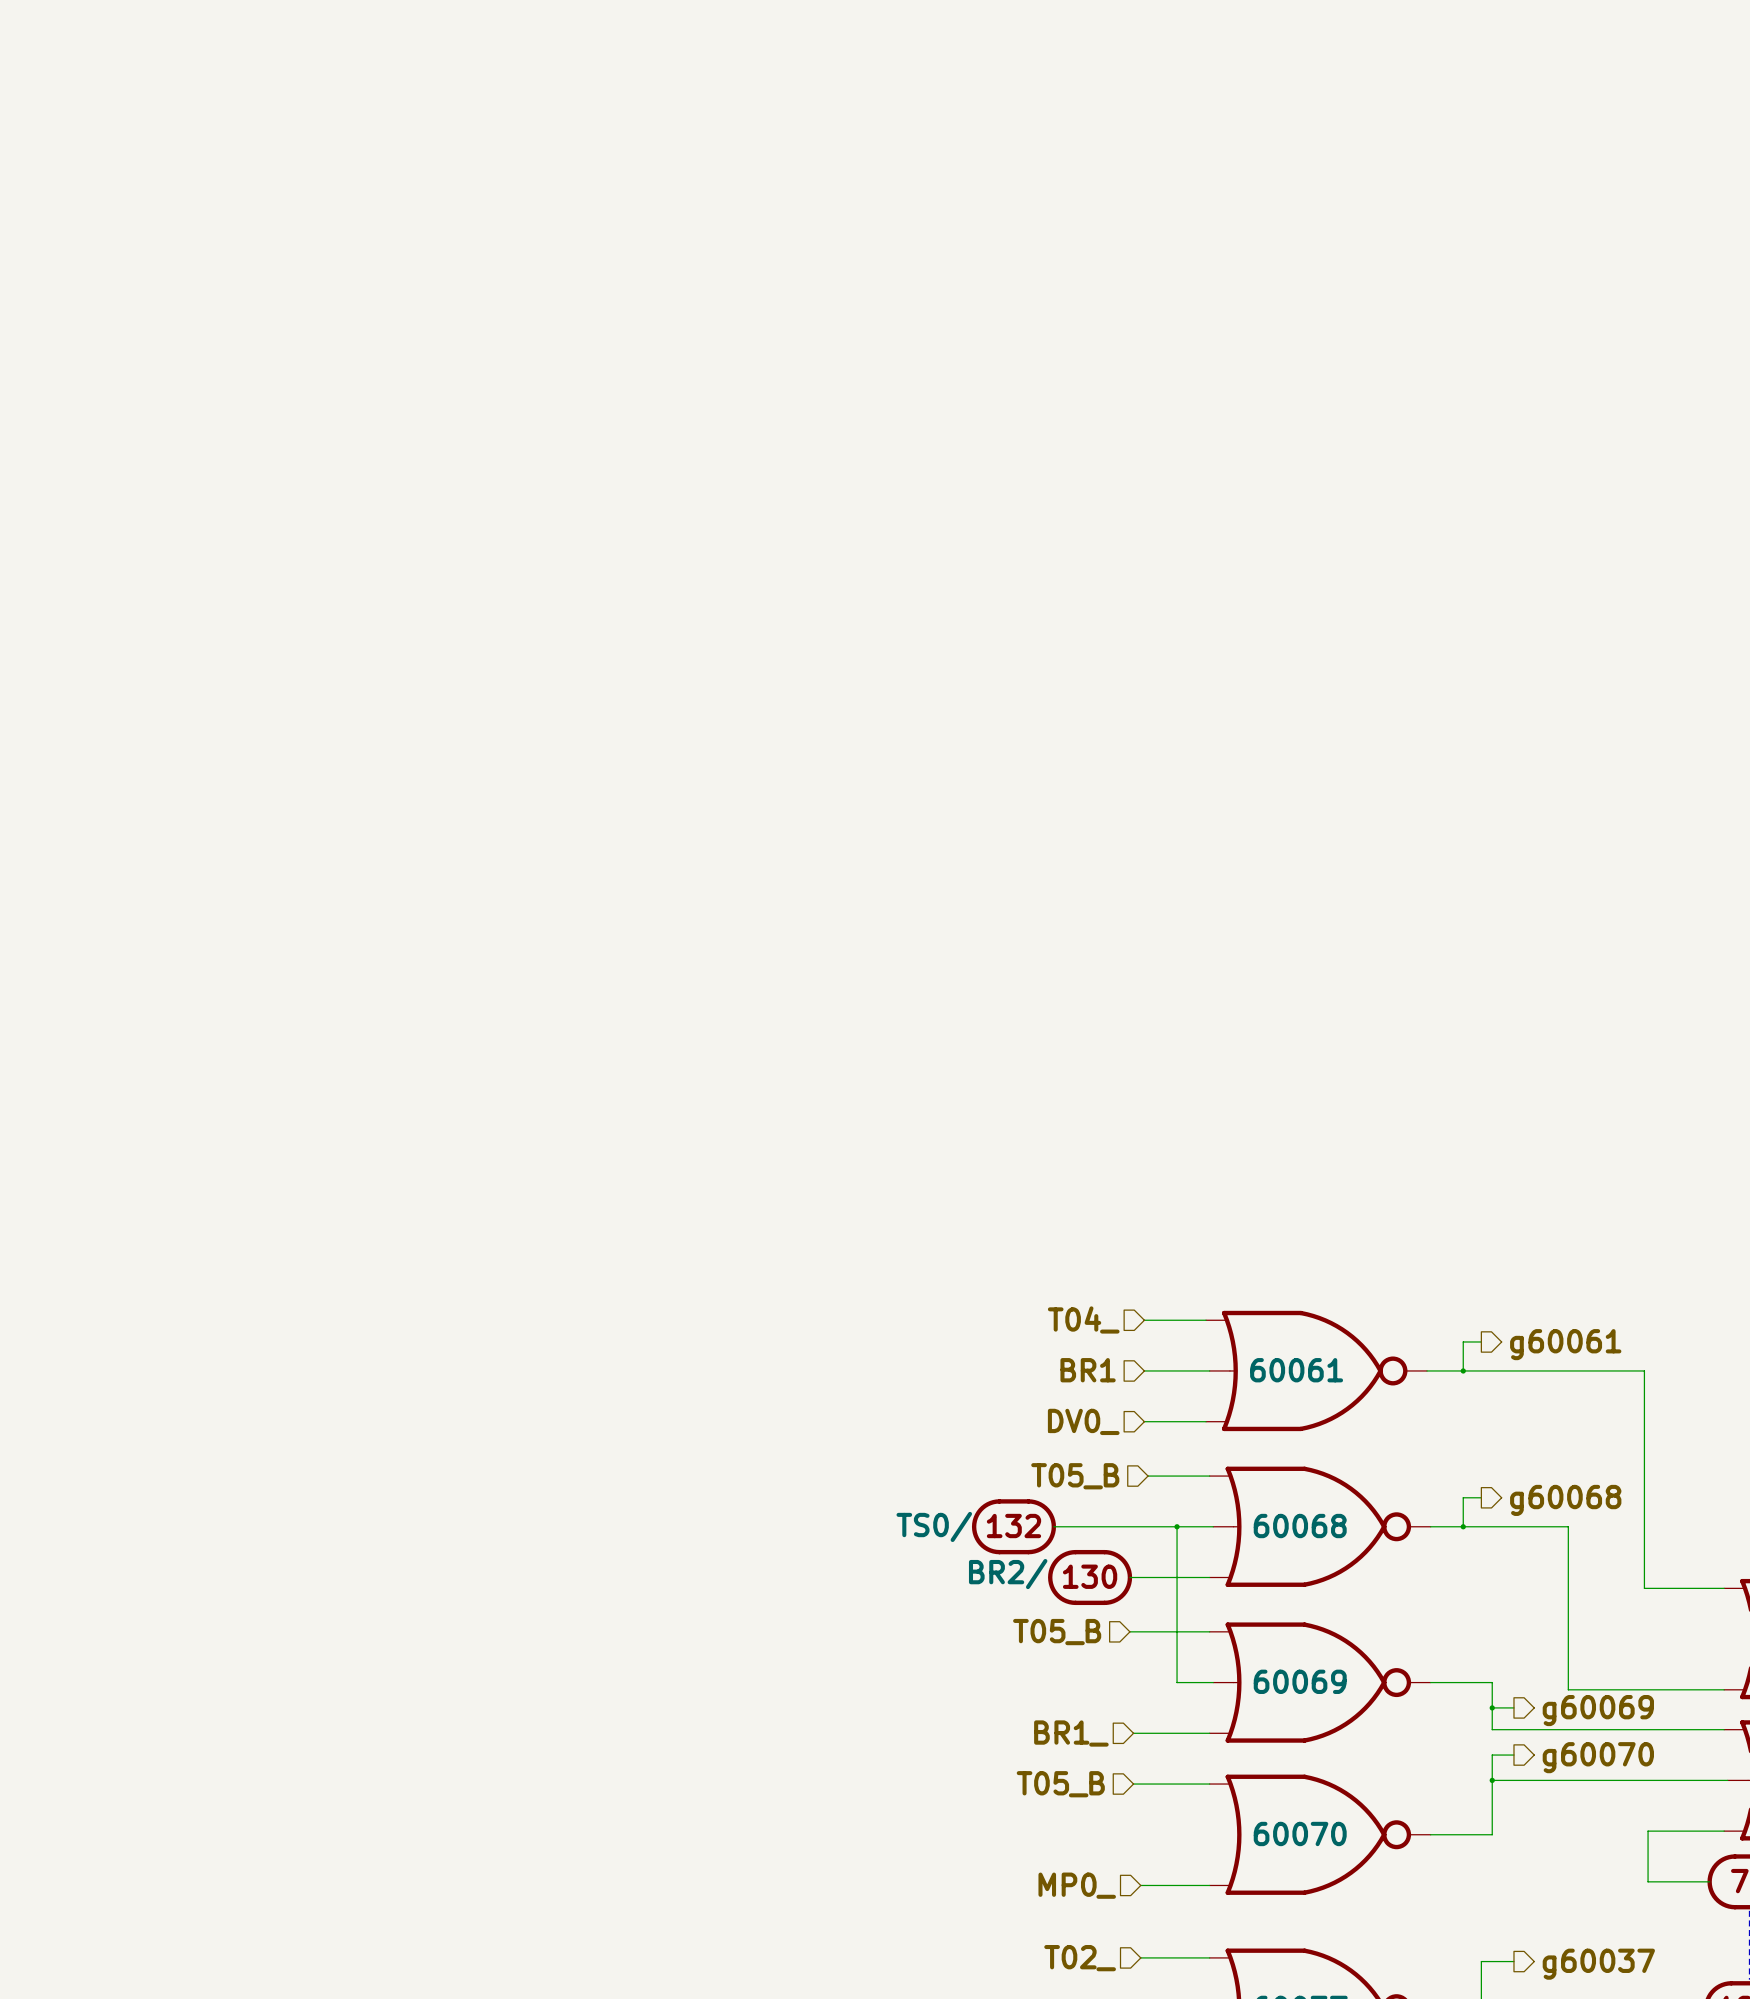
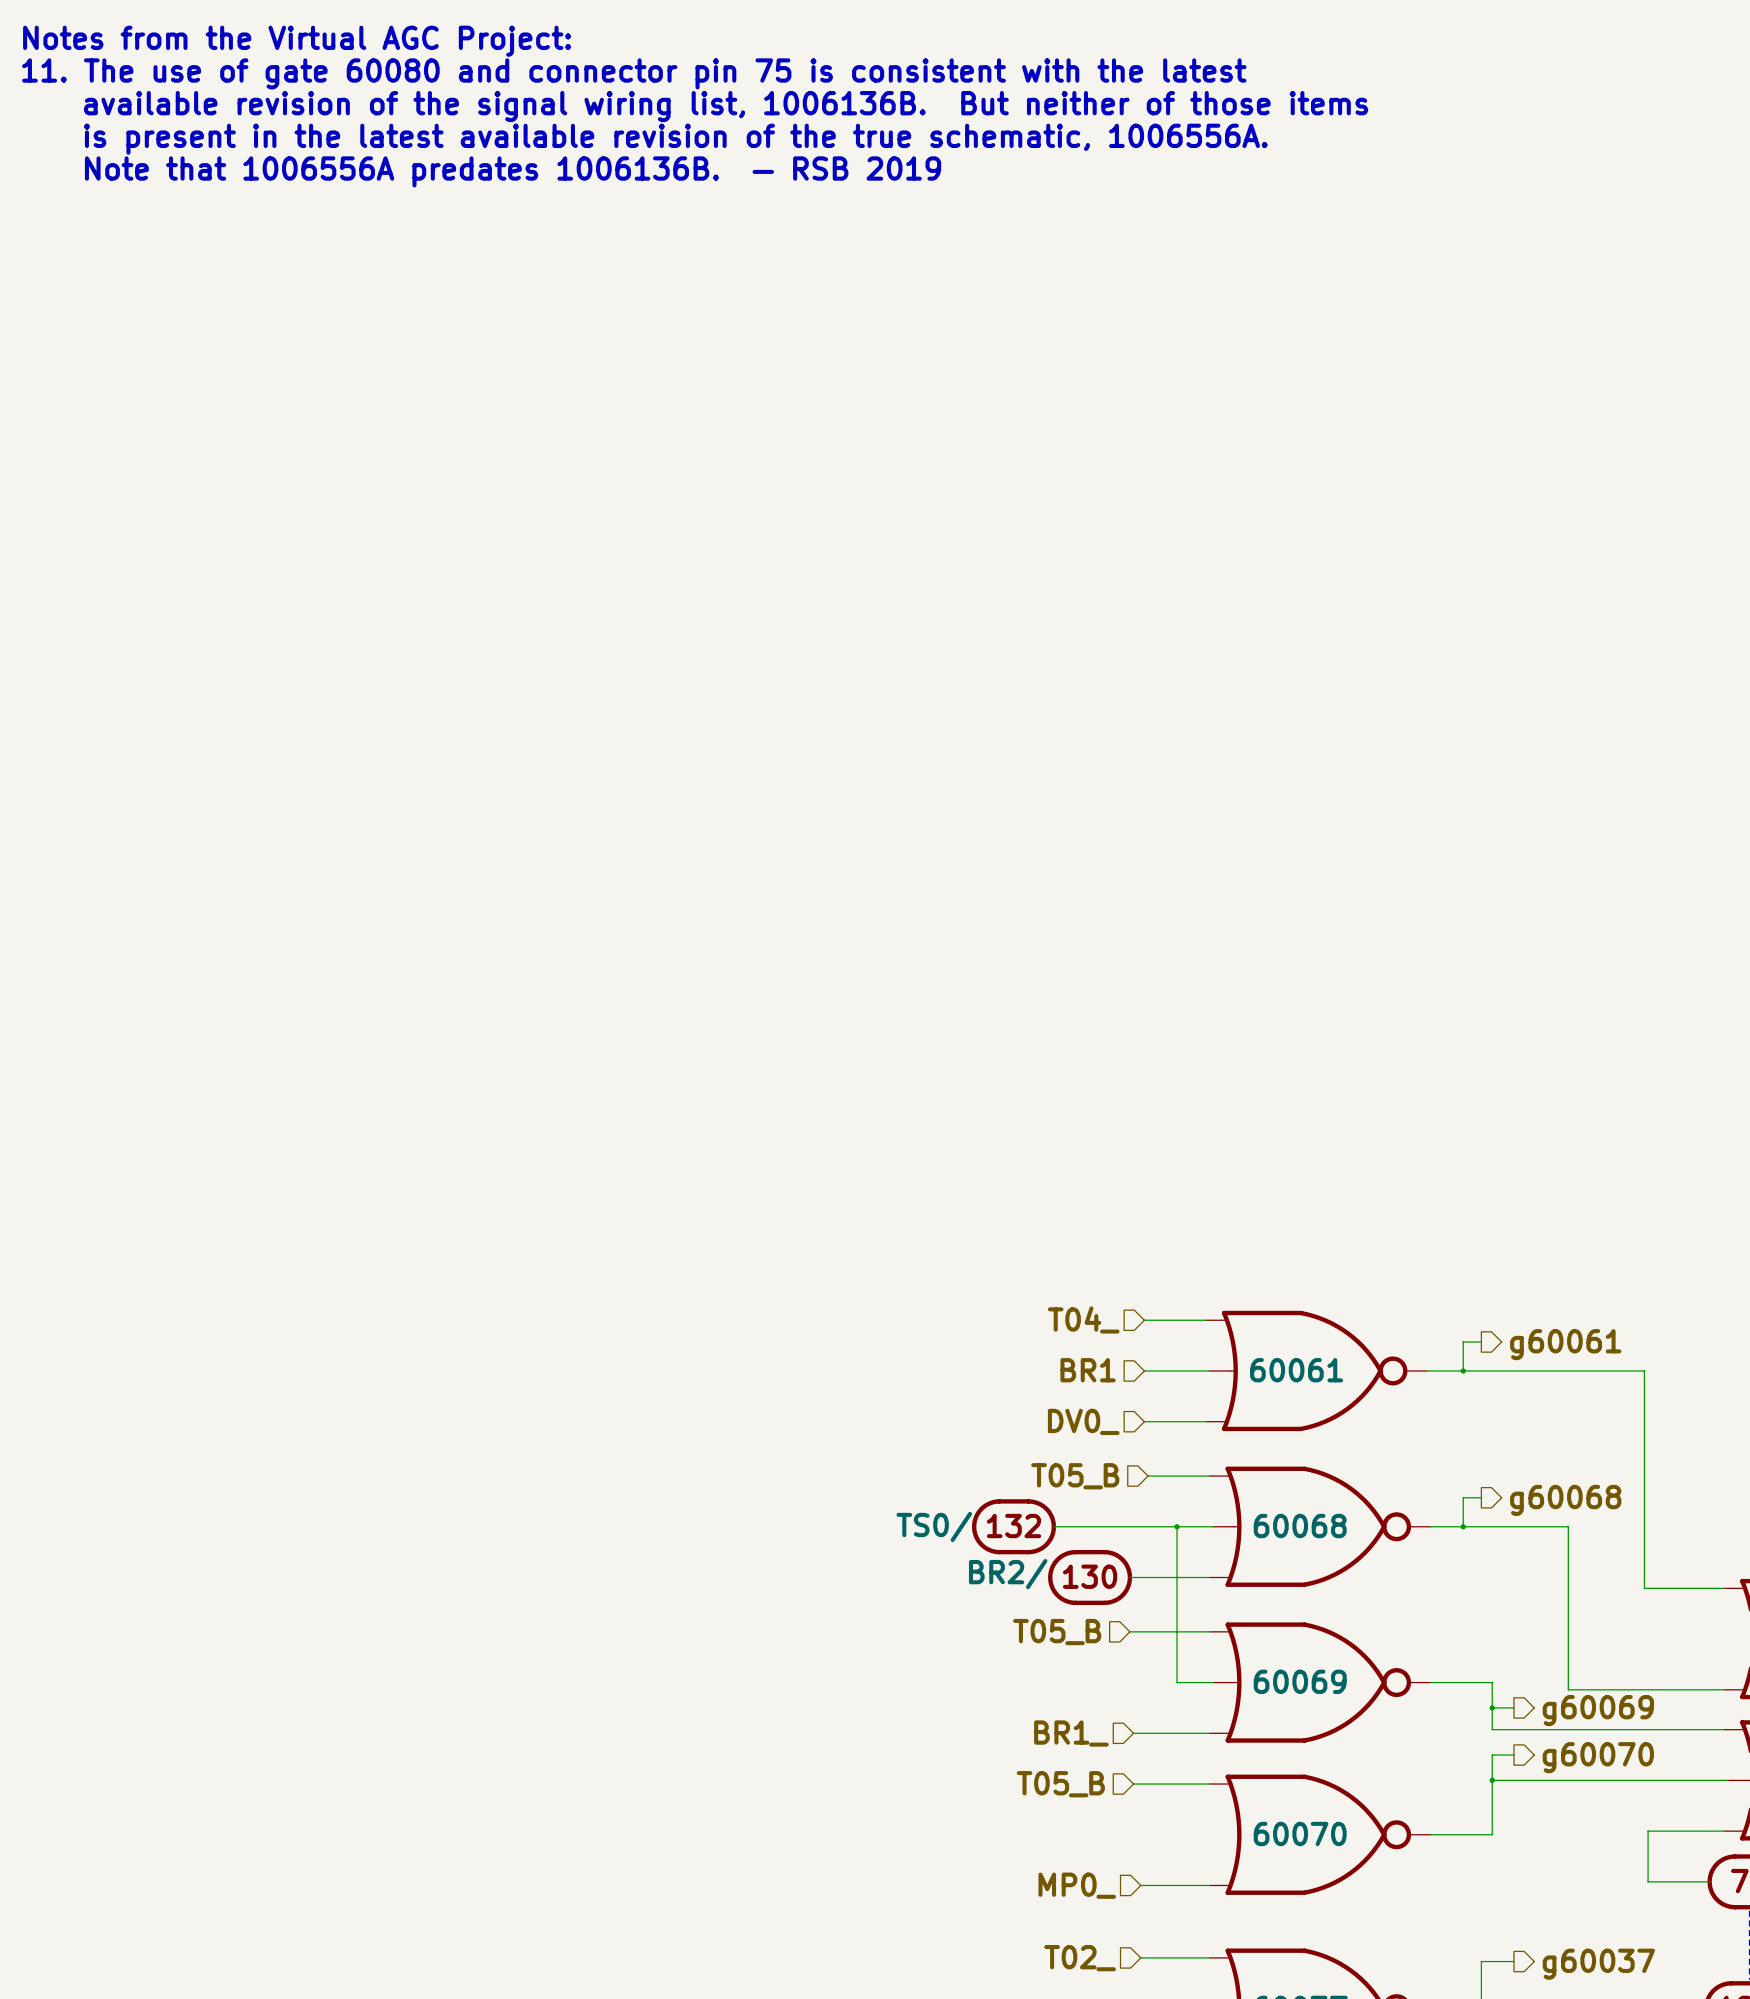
text: none -> Notes from the Virtual AGC Project: (297, 41)
text: none -> 11. The use of gate 60080 and connector pin 75 is consistent with the latest (634, 73)
text: none -> available revision of the signal wiring list, 1006136B. But neither of those items (726, 106)
text: none -> is present in the latest available revision of the true schematic, 1006556A. (675, 139)
text: none -> Note that 1006556A predates 1006136B. — RSB 2019 (513, 171)

